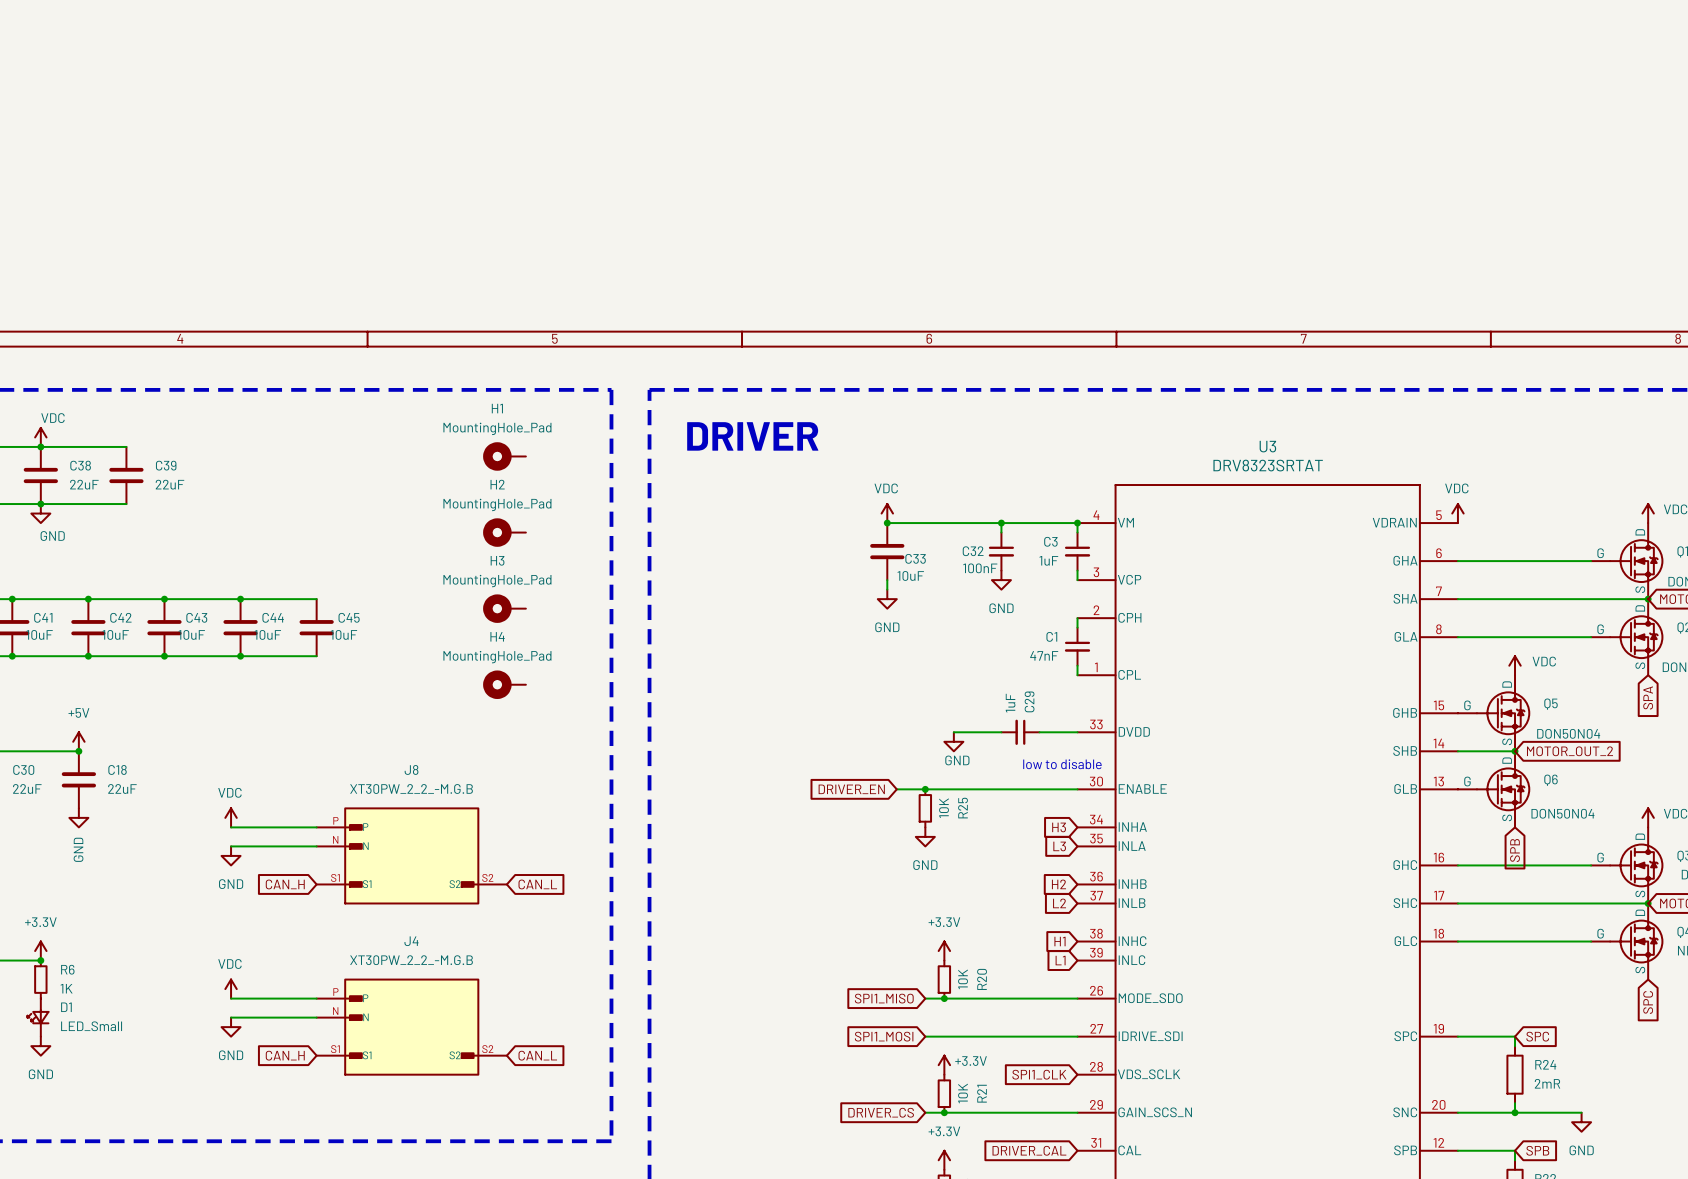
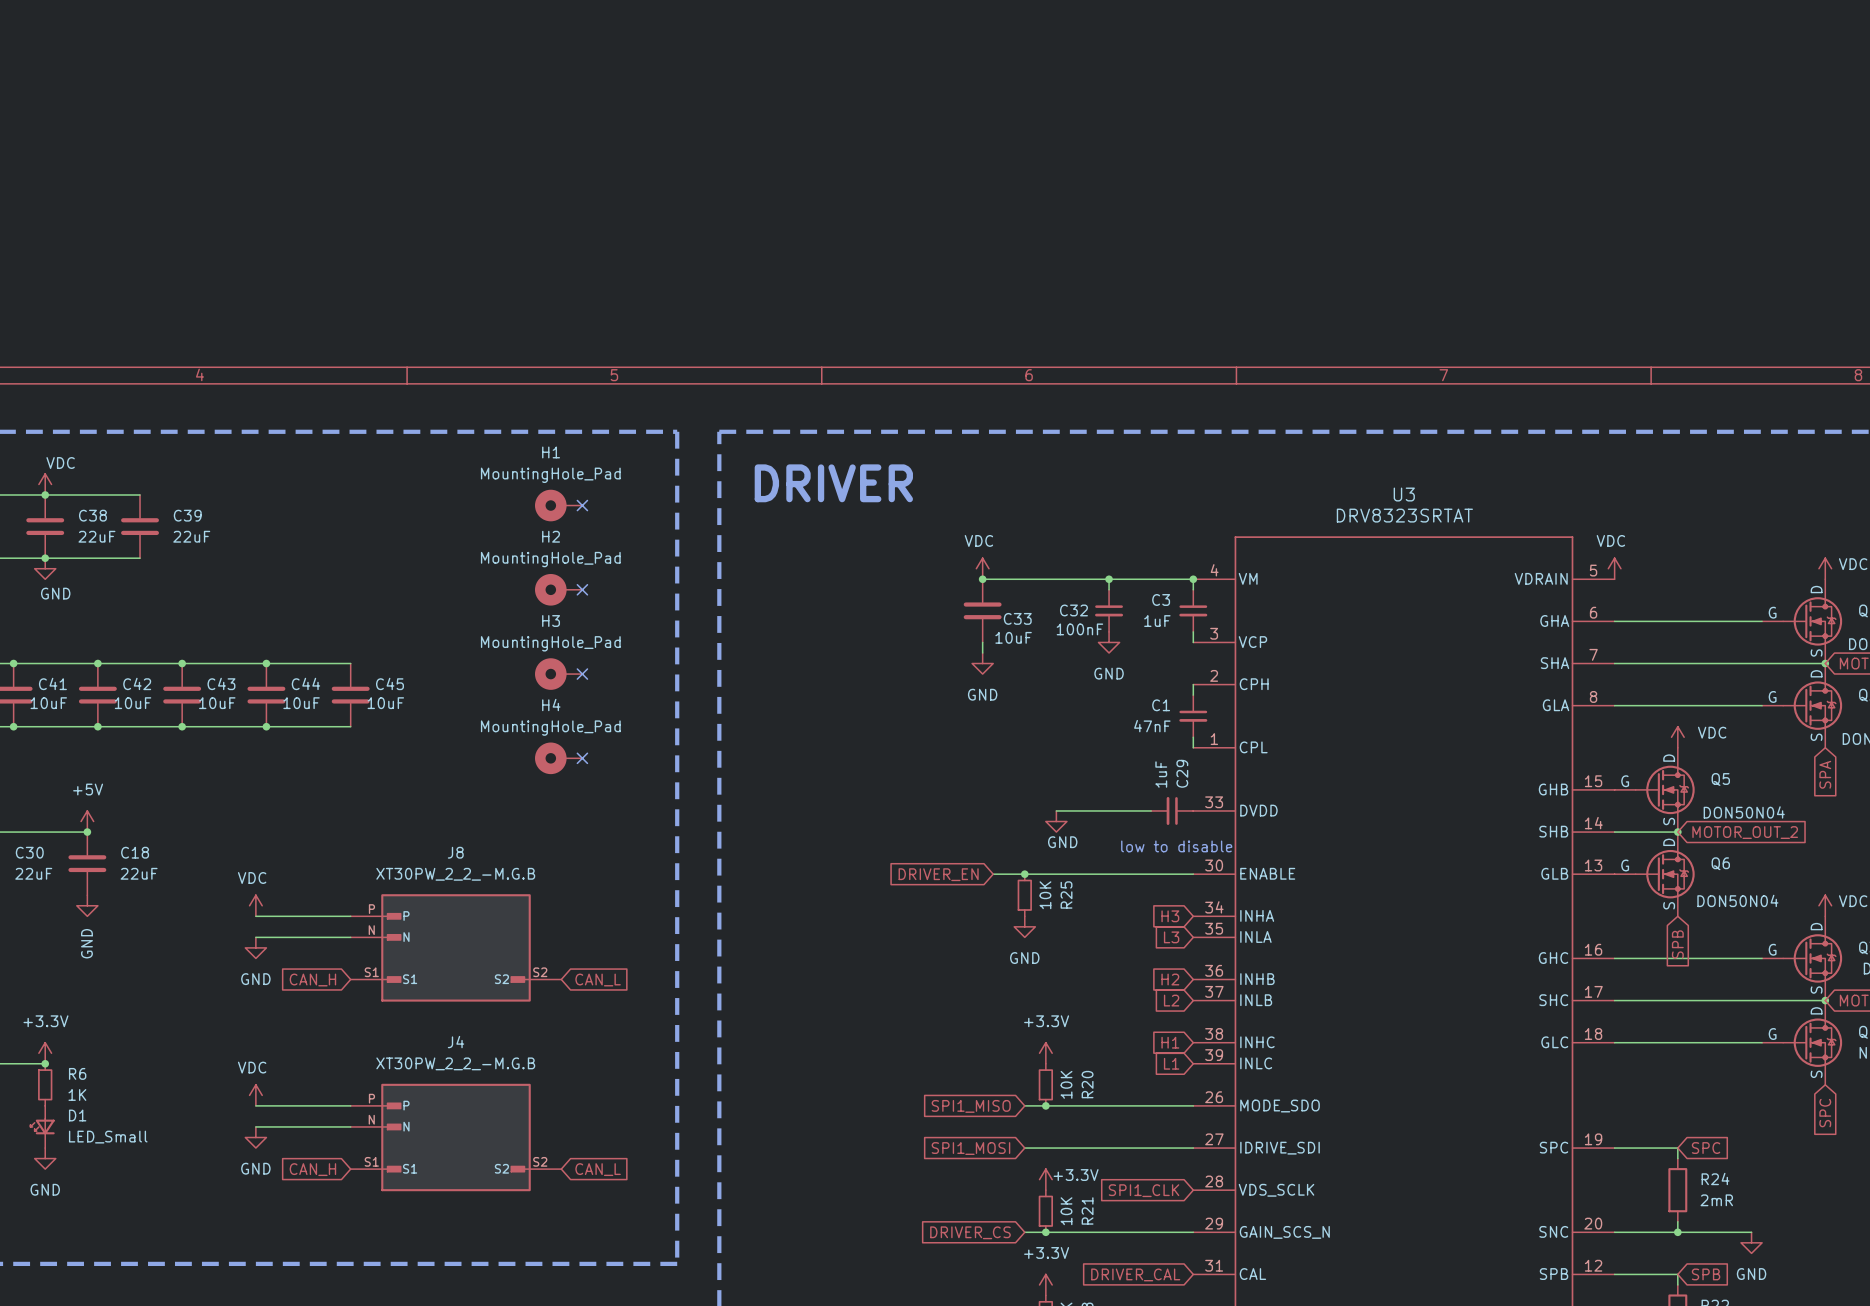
no-connect mark: none -> (582, 505)
no-connect mark: none -> (582, 589)
no-connect mark: none -> (582, 674)
no-connect mark: none -> (582, 758)
C29 position: (1020, 732) -> (1172, 810)

